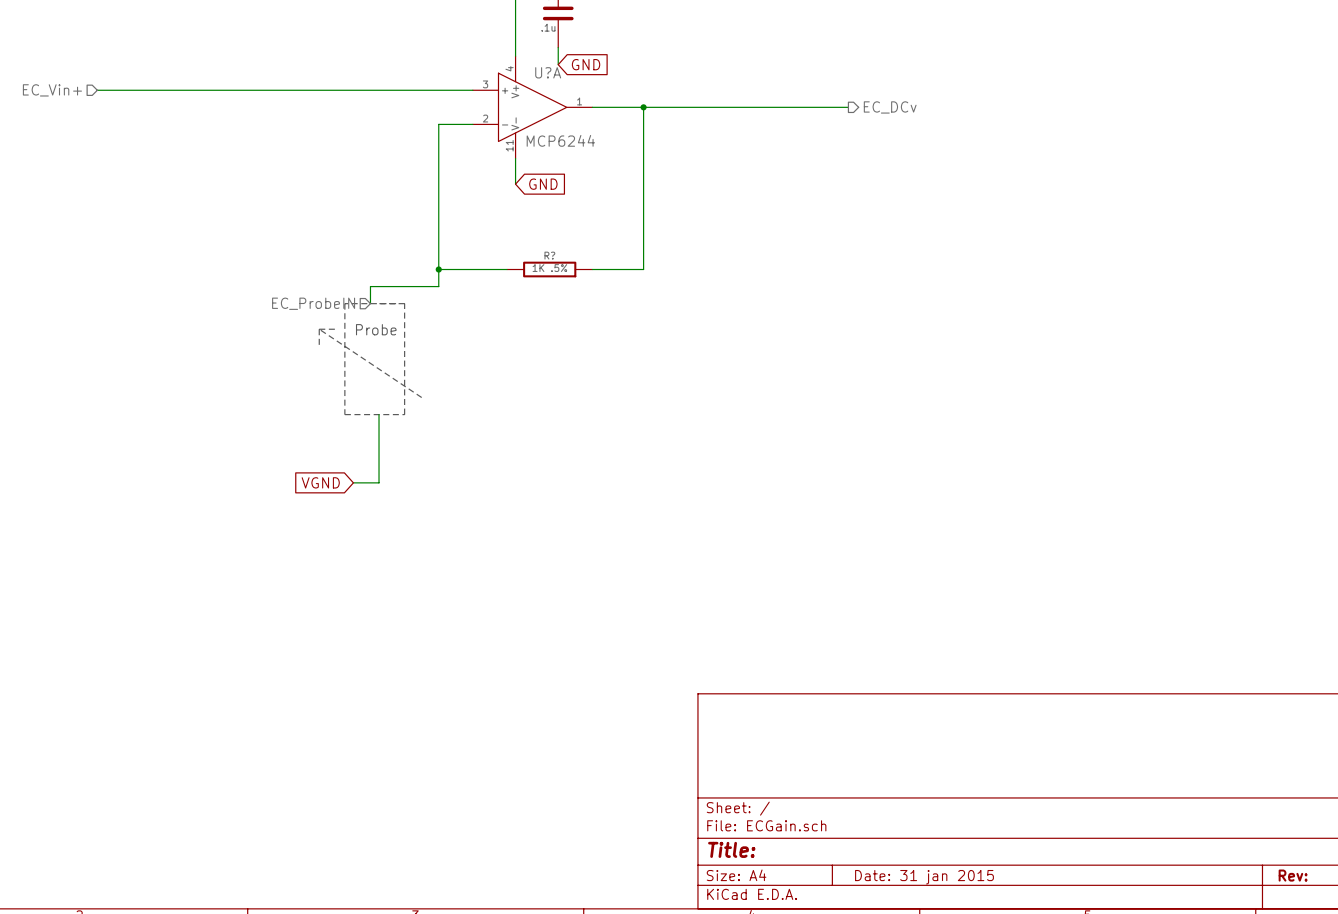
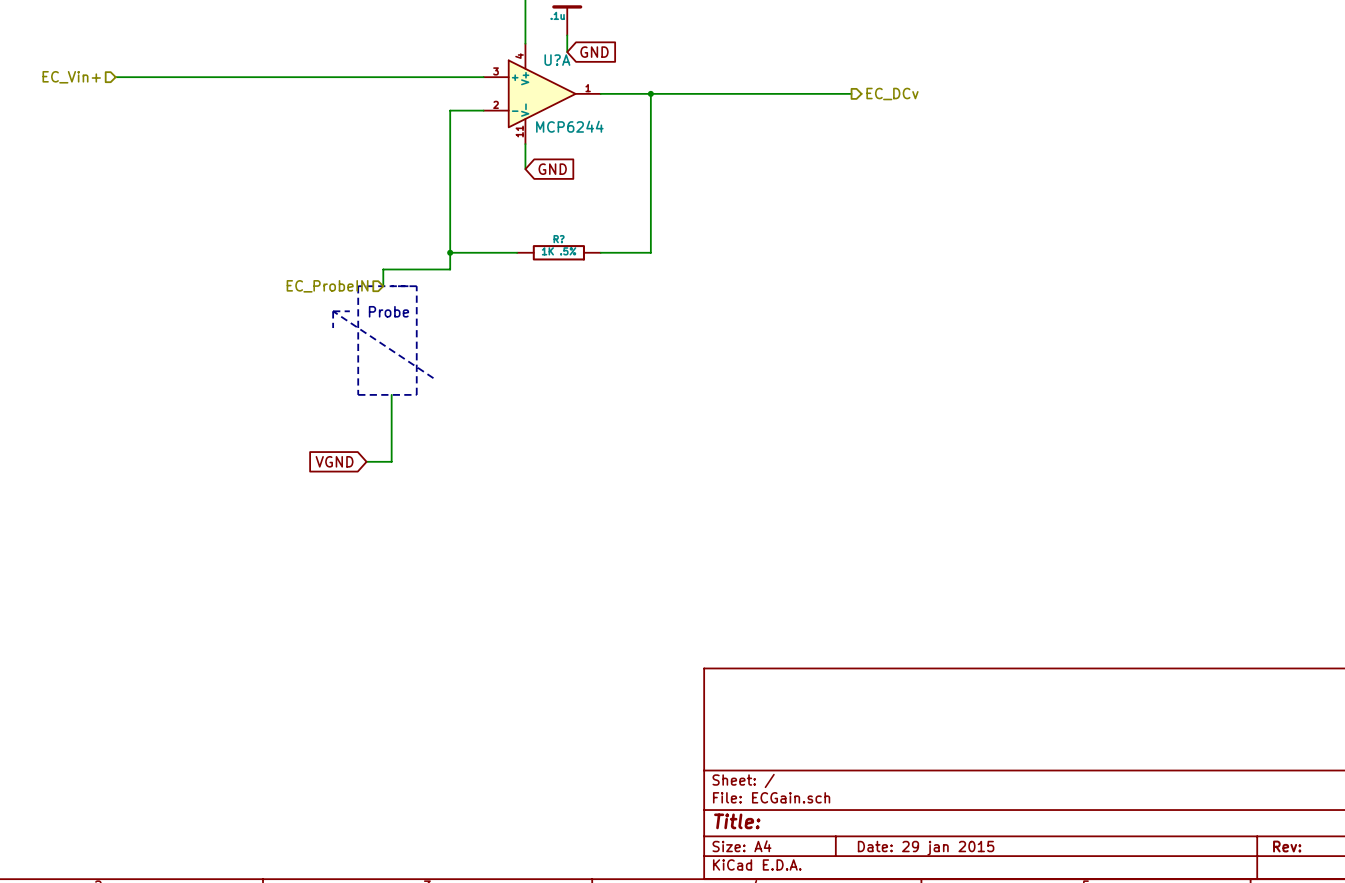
title block: Date: 31 jan 2015 (924, 877) -> Date: 29 jan 2015 (926, 848)

